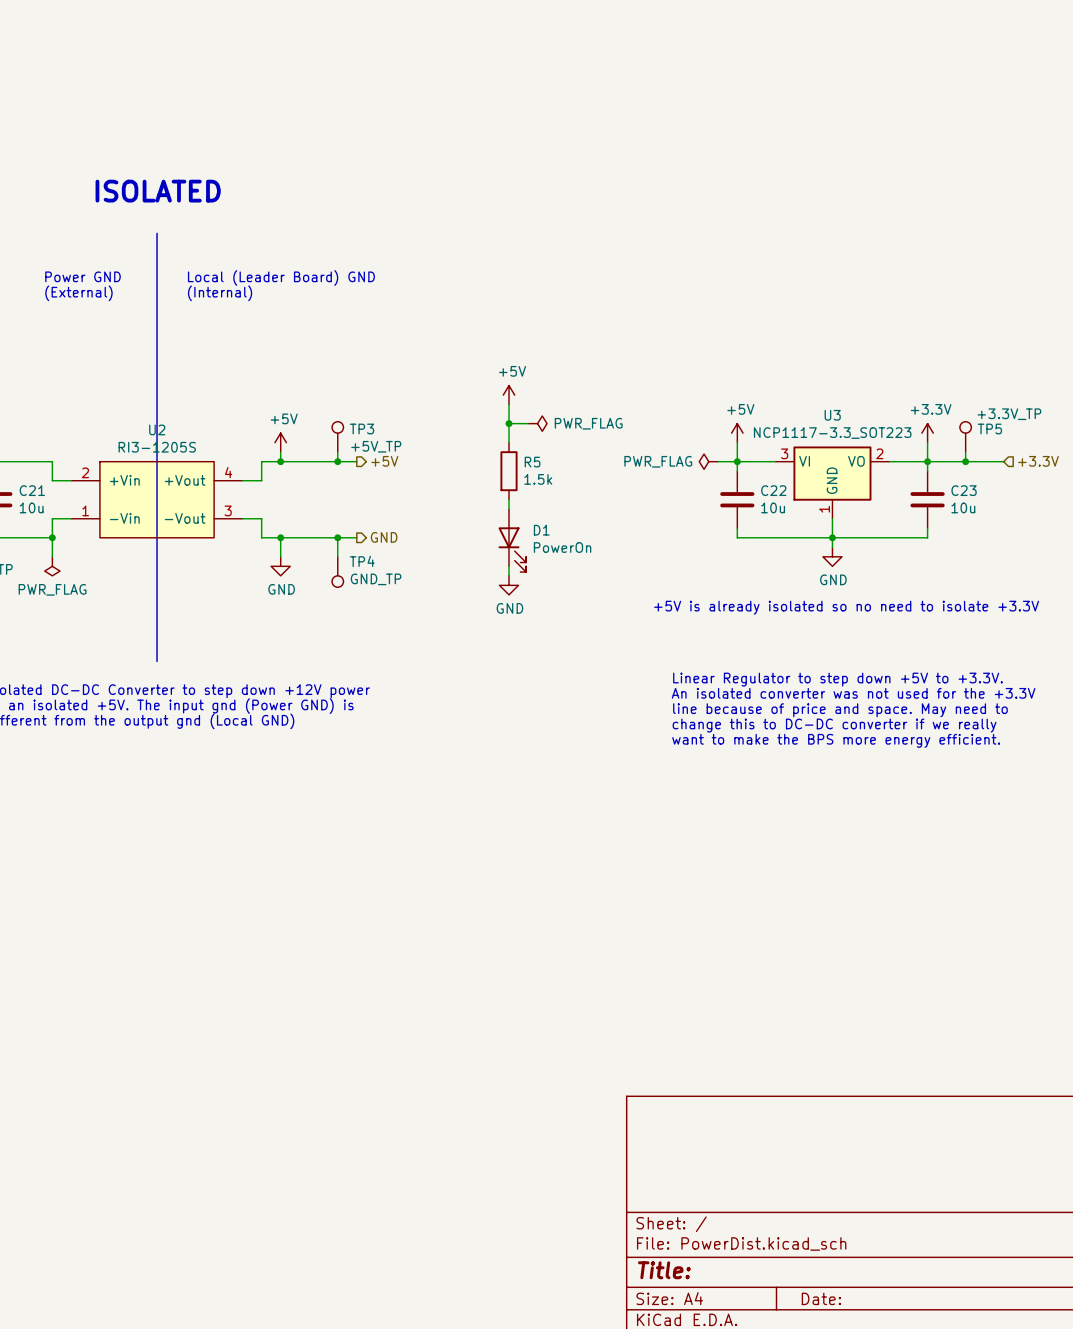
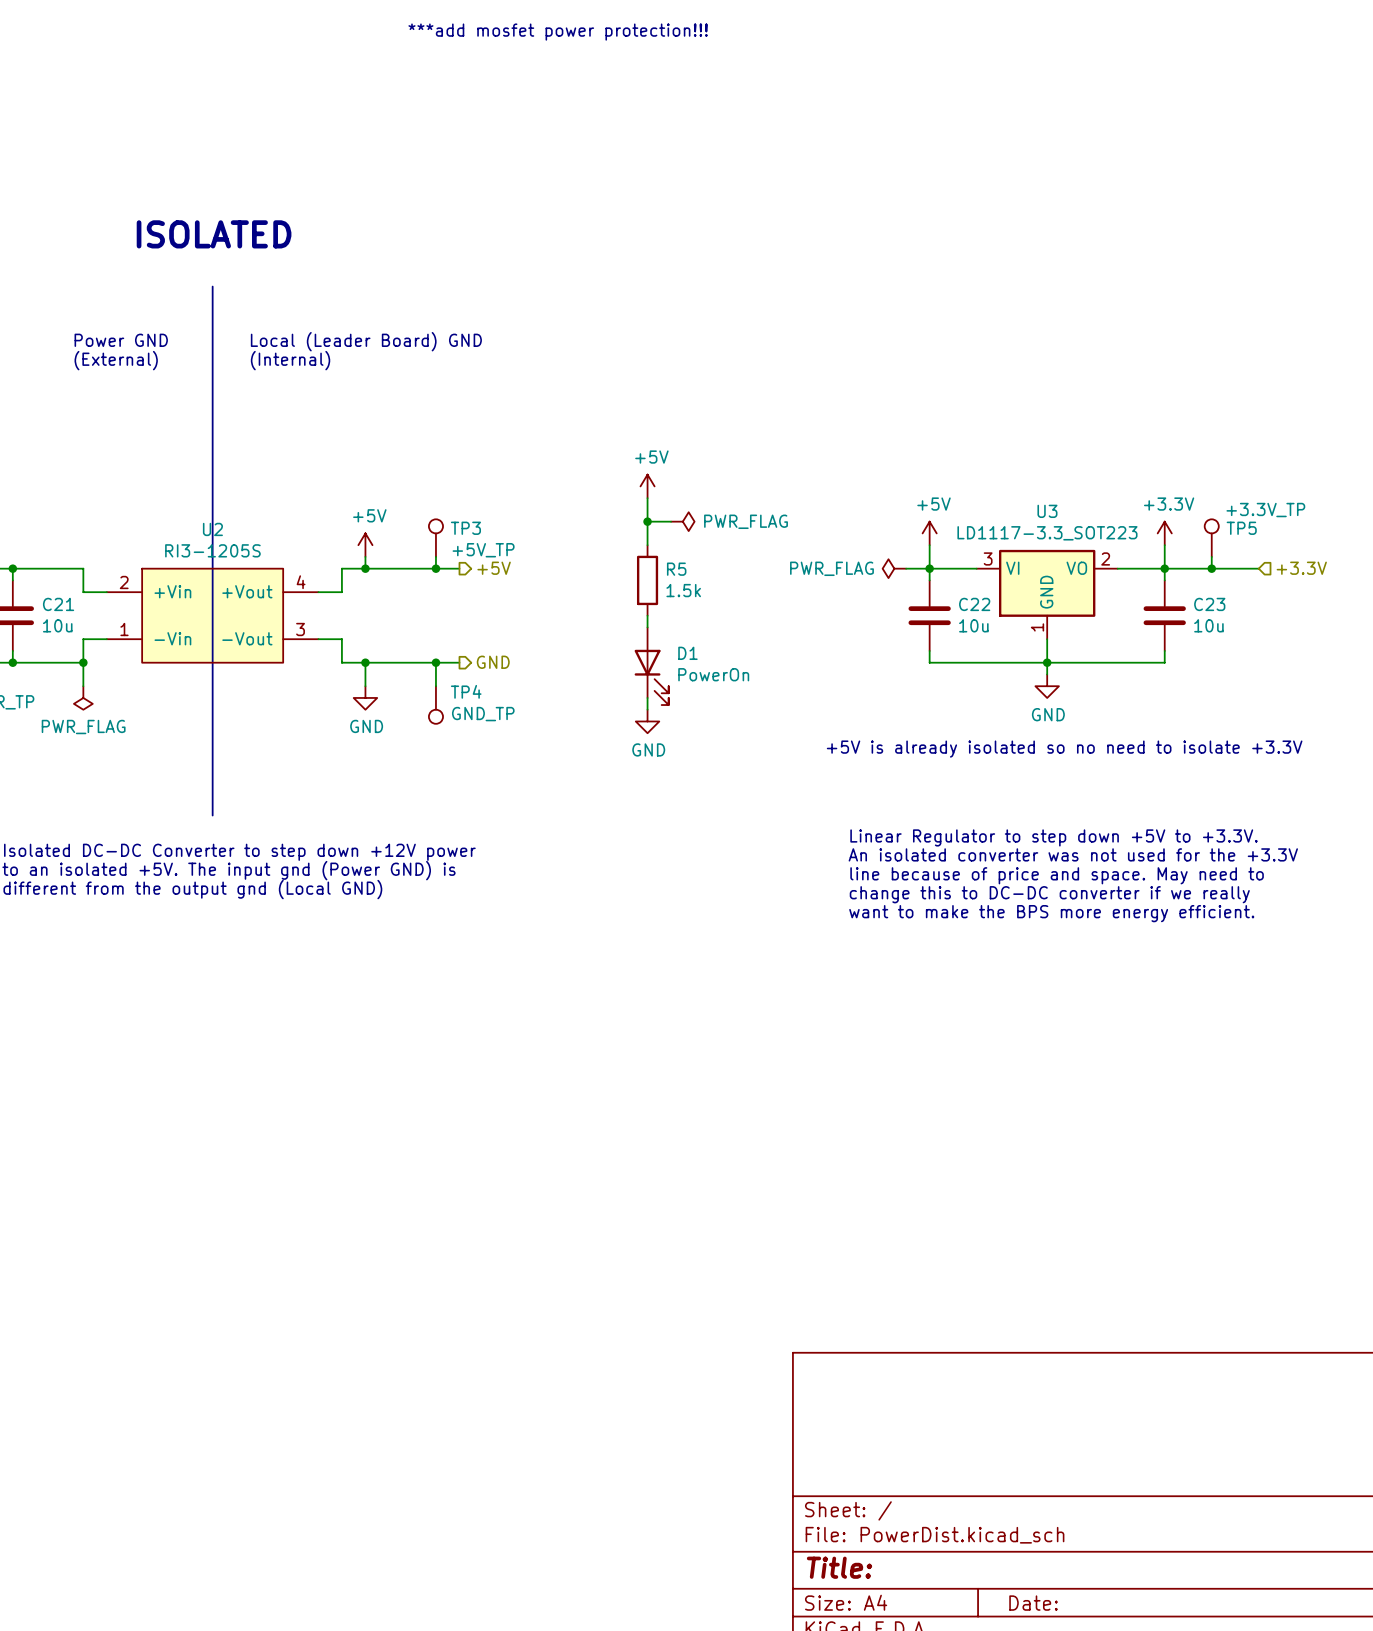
text: none -> ***add mosfet power protection!!! (558, 32)
U3 value: NCP1117-3.3_SOT223 (832, 433) -> LD1117-3.3_SOT223 (1047, 533)

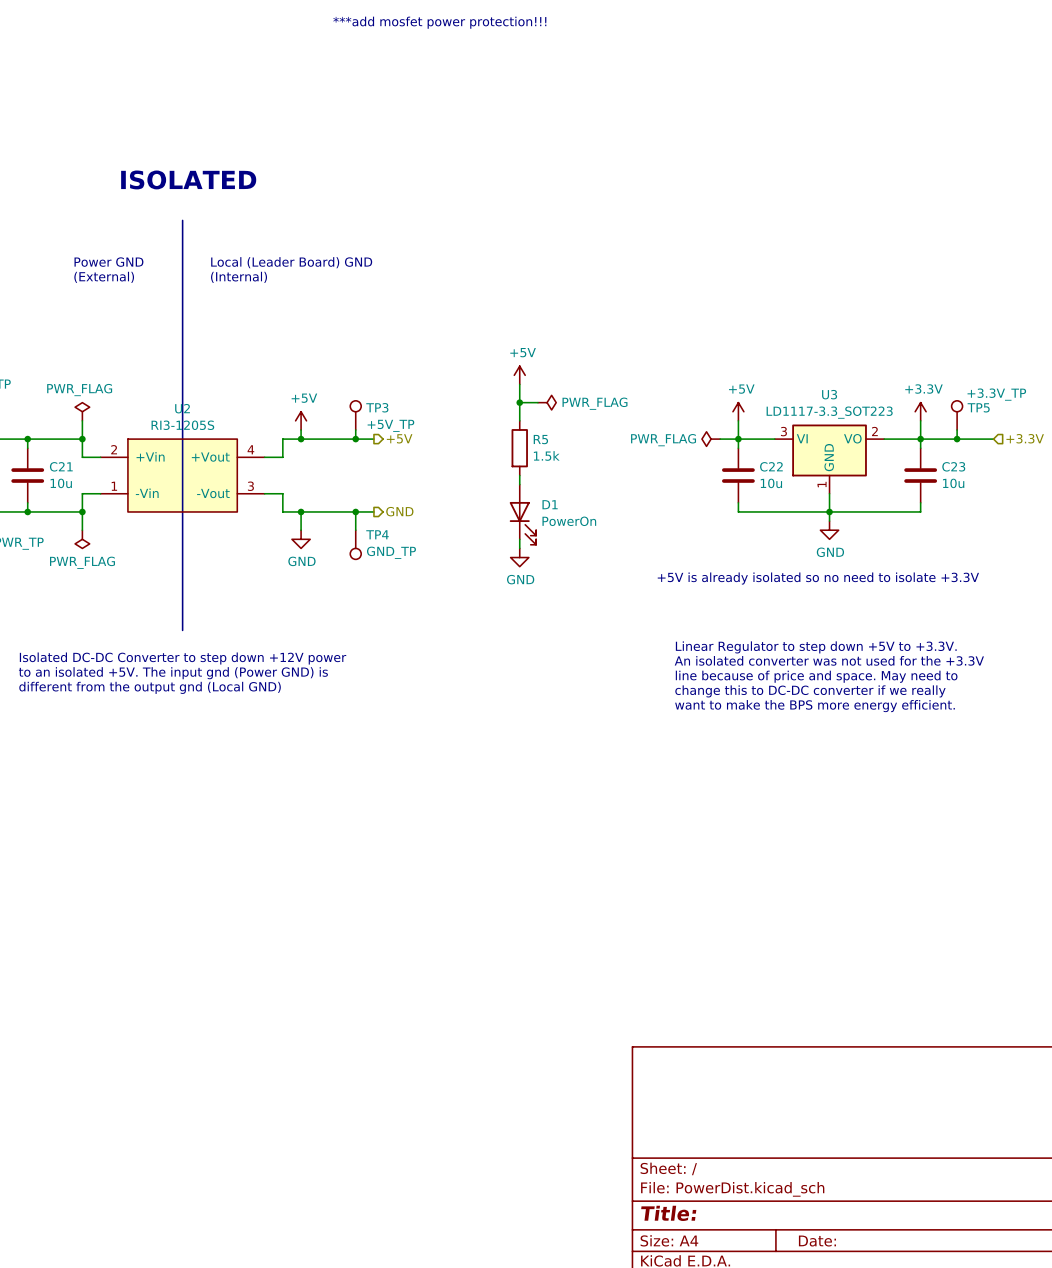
power symbol: none -> PWR_FLAG (82, 411)
wire: none -> (82, 420) (82, 439)
junction: none -> (82, 439)

